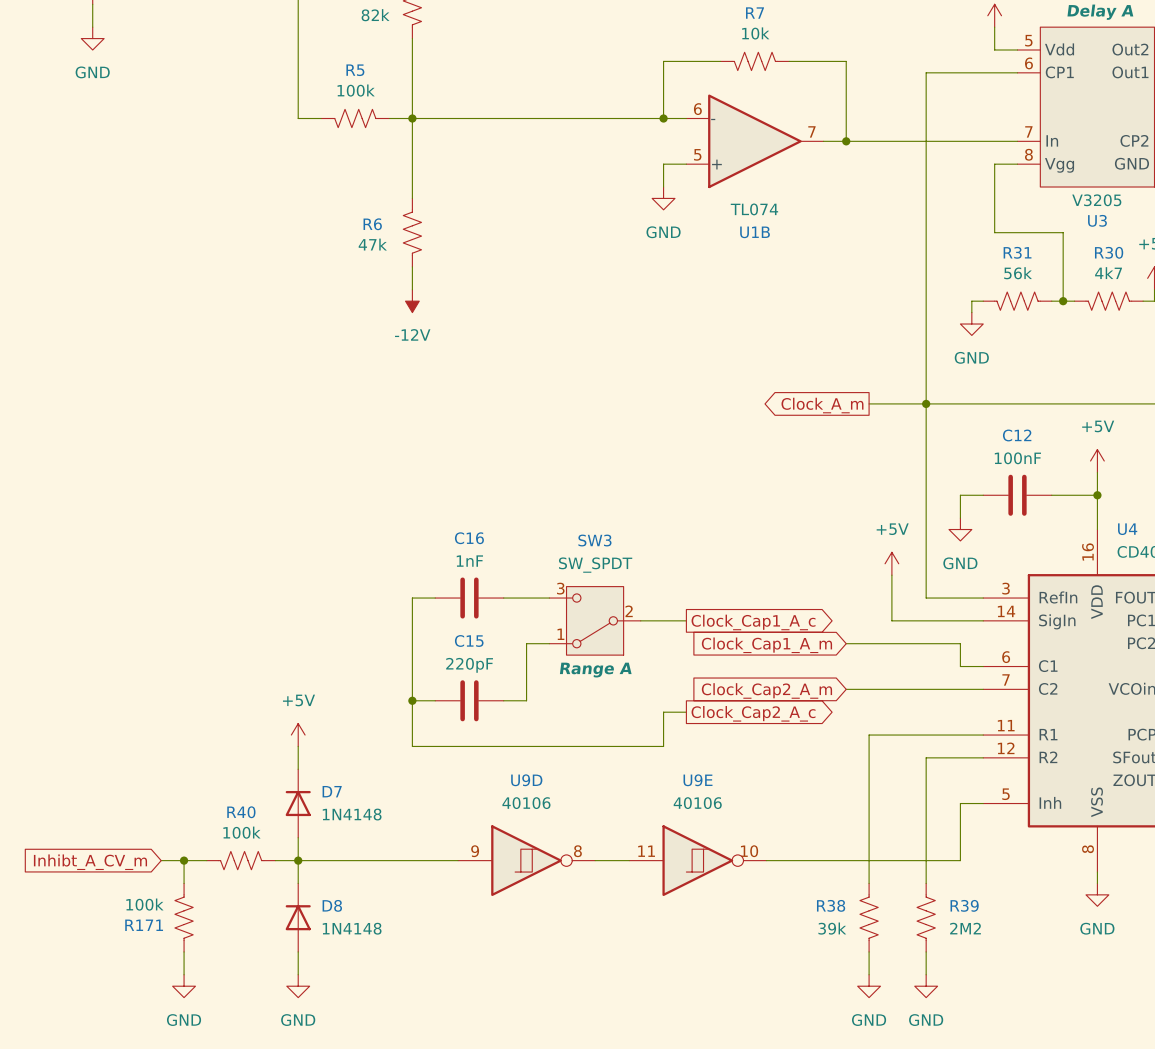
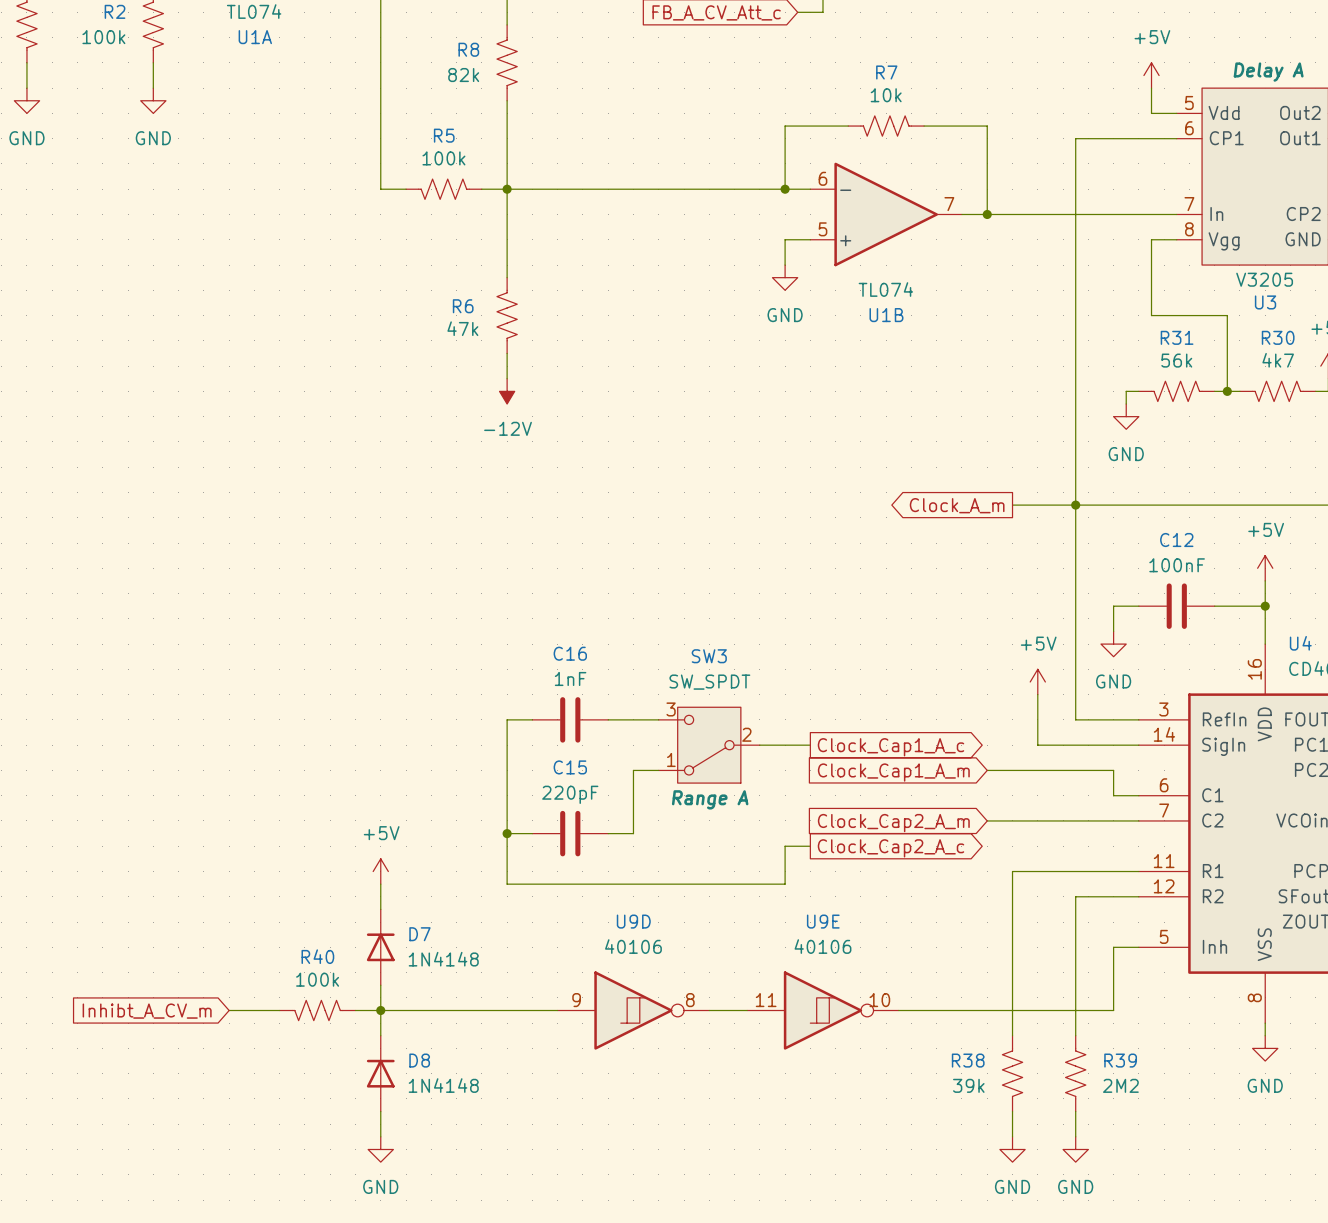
wire: (184, 860) (184, 883) -> none
junction: (184, 860) -> none
R171: 100k (184, 917) -> none
wire: (184, 951) (184, 974) -> none
power symbol: GND (184, 986) -> none

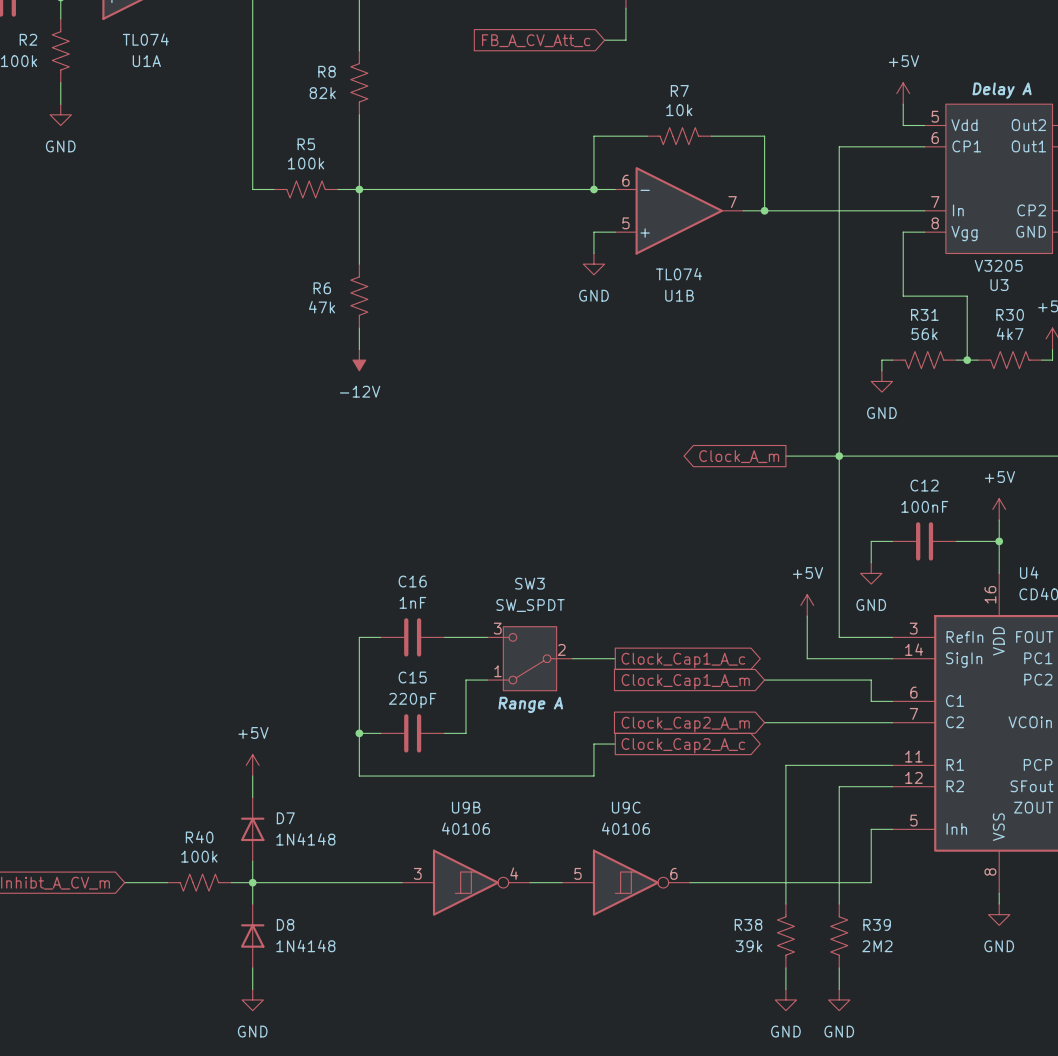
U9D name: U9D (633, 921) -> U9B (466, 807)
U9E name: U9E (823, 921) -> U9C (626, 807)
U9D pin number: 9 (576, 1000) -> 3 (417, 873)
U9D pin number: 8 (690, 1000) -> 4 (514, 873)
U9E pin number: 11 (766, 1000) -> 5 (577, 873)
U9E pin number: 10 (879, 1000) -> 6 (673, 873)

